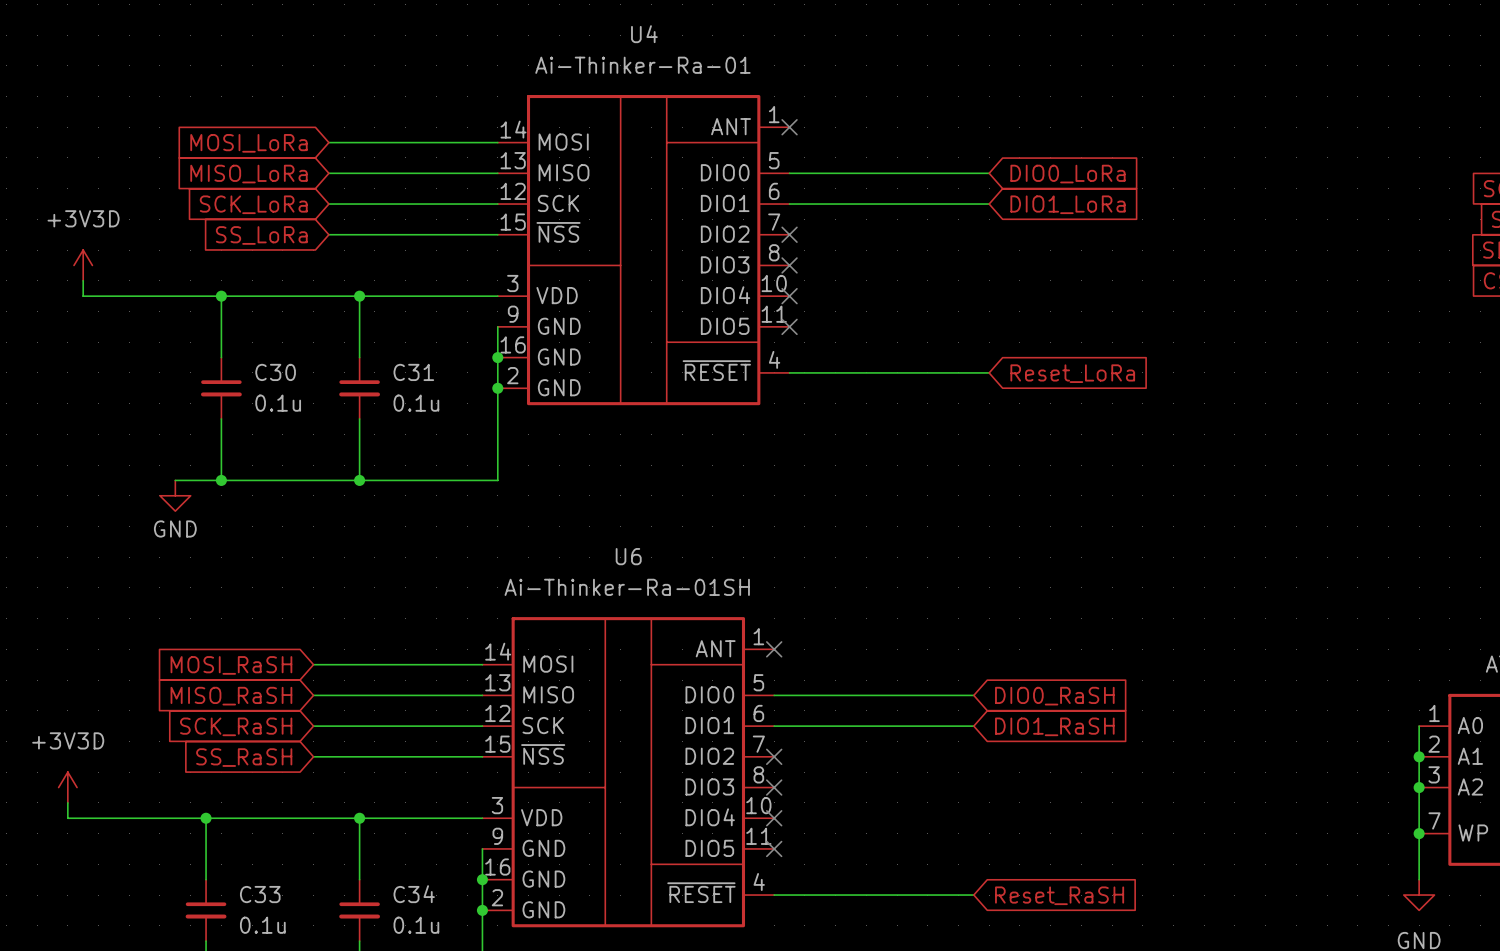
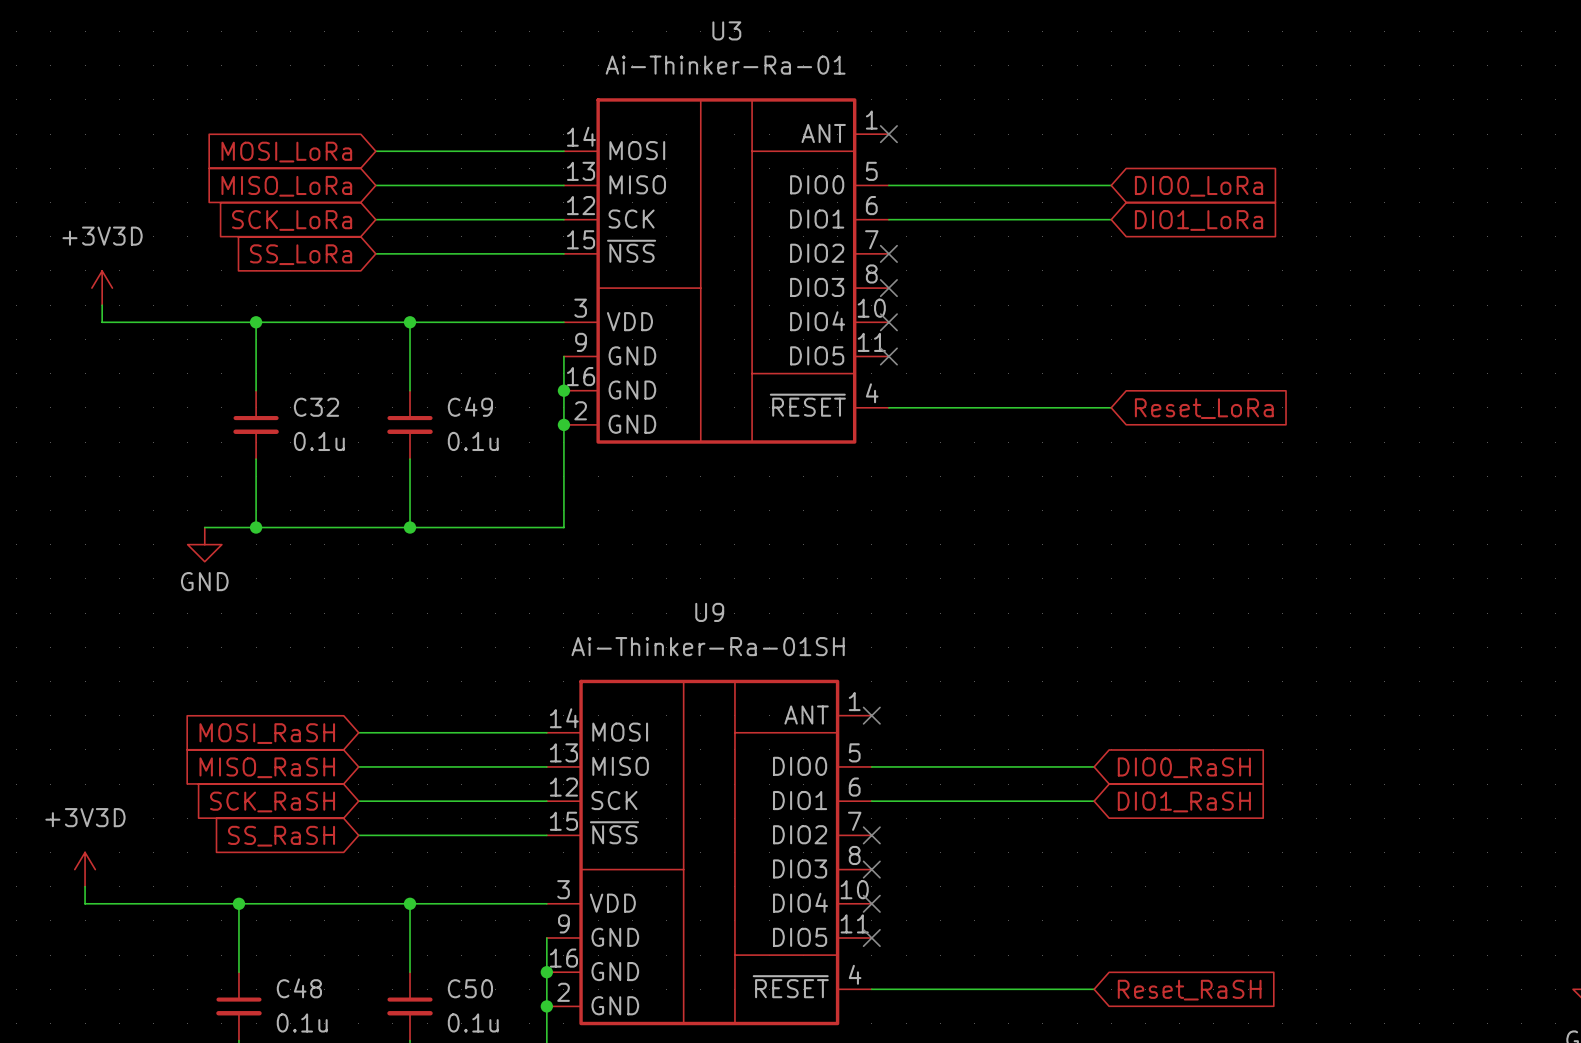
U4 name: U4 (644, 34) -> U3 (726, 30)
C30 name: C30 (275, 372) -> C32 (316, 407)
C31 name: C31 (413, 372) -> C49 (470, 406)
U6 name: U6 (628, 556) -> U9 (709, 612)
C33 name: C33 (260, 894) -> C48 (299, 988)
C34 name: C34 (414, 894) -> C50 (470, 988)

